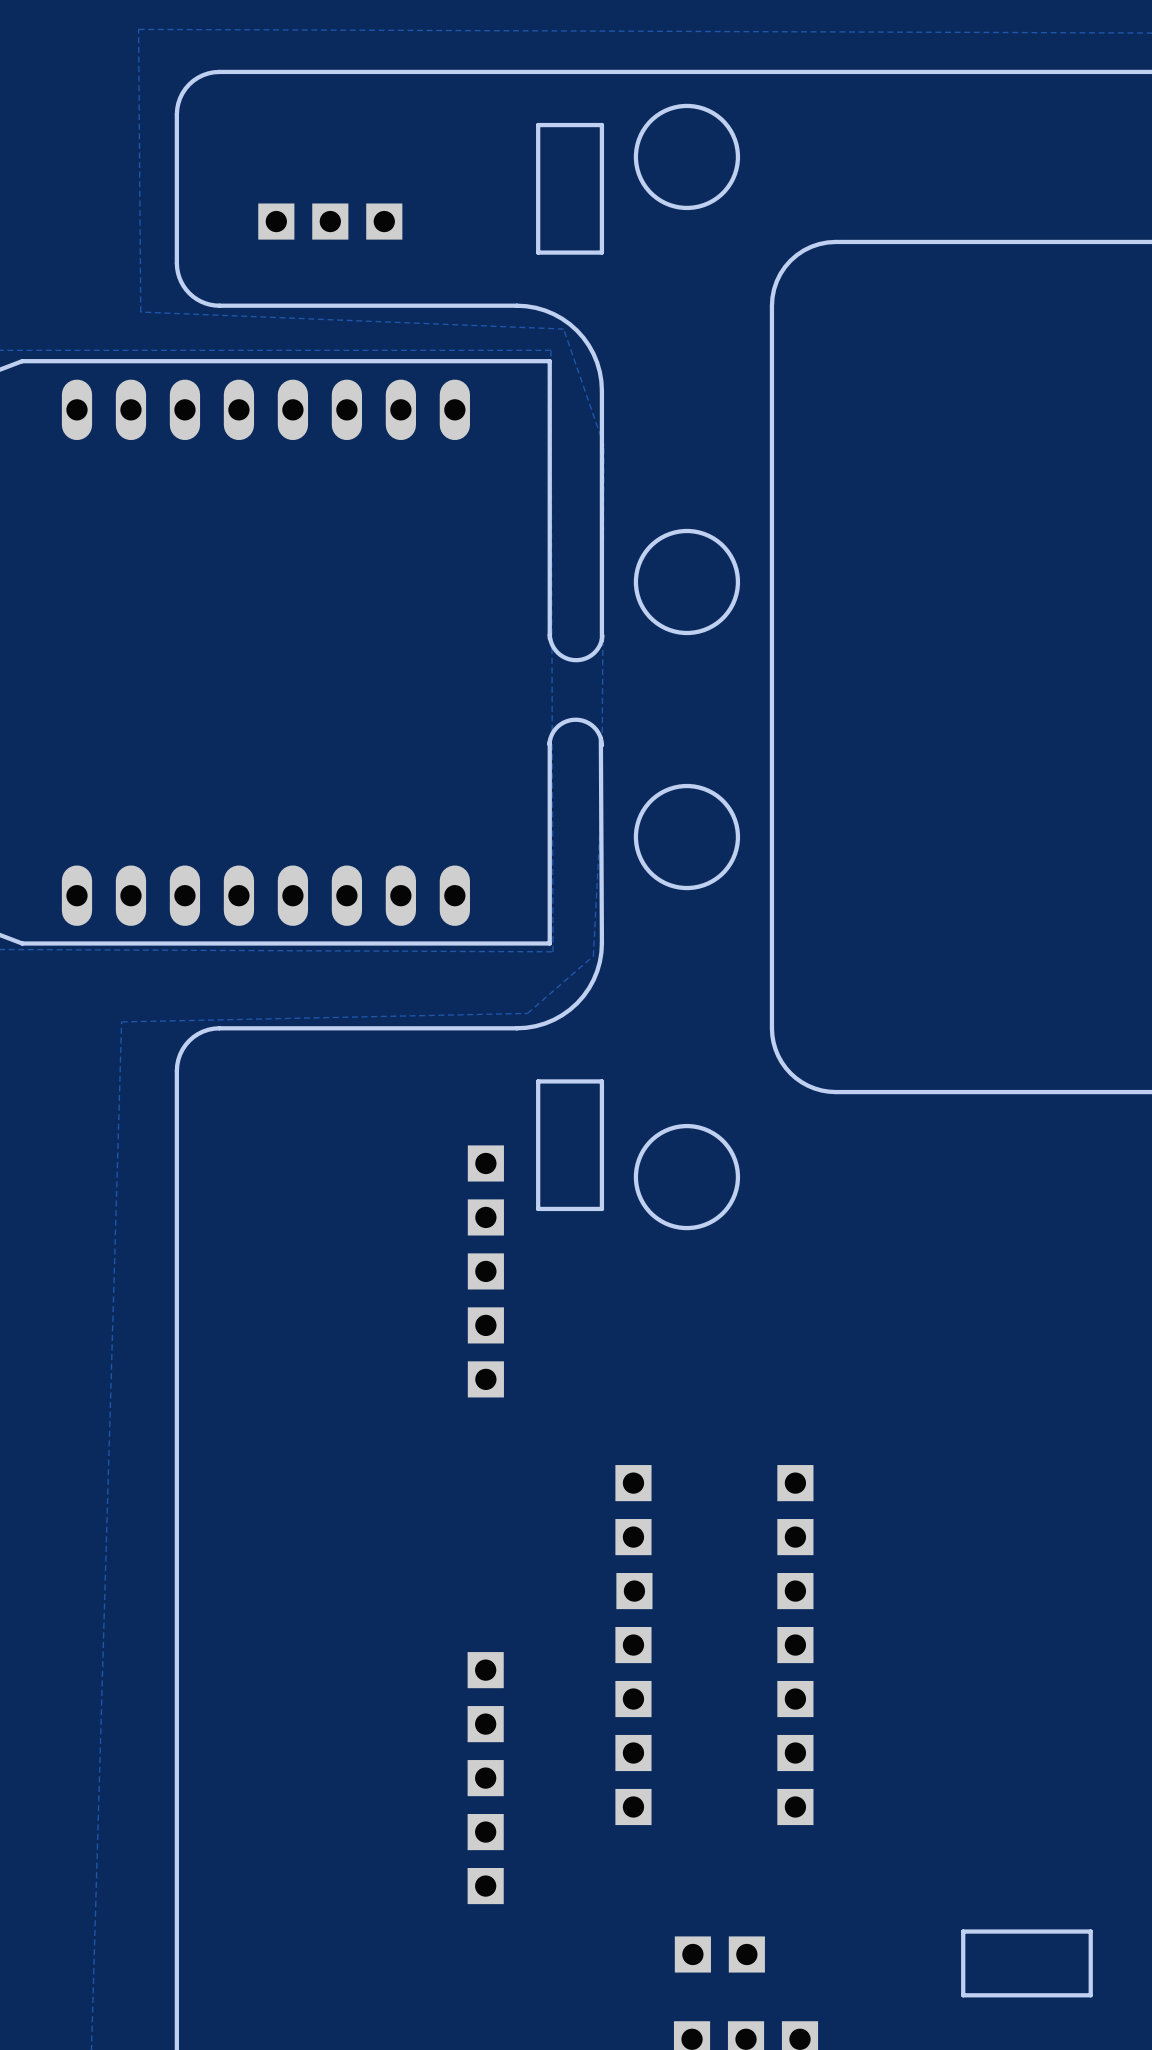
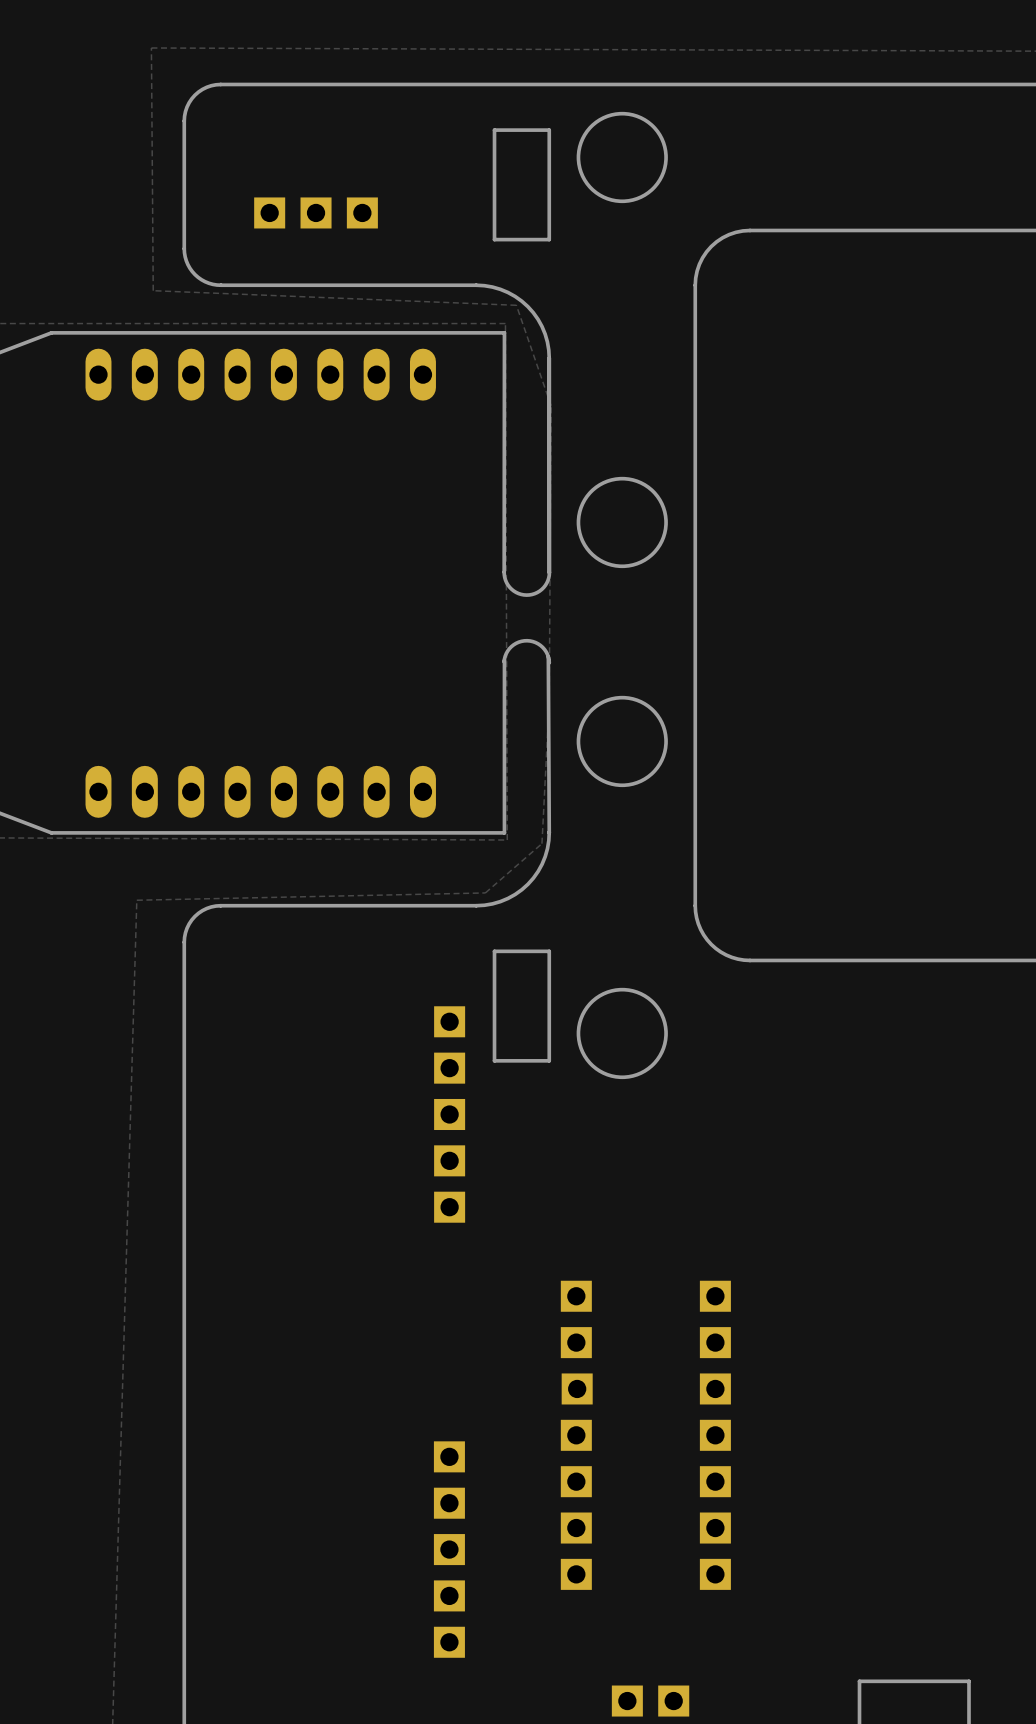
board edge: (549, 361) (549, 638) -> (504, 332) (504, 574) (511, 589) (523, 594) (532, 594) (541, 589) (549, 575) (549, 358)
board edge: (549, 634) (551, 644) (557, 652) (565, 658) (575, 660) (585, 658) (593, 653) (599, 645) (602, 635) -> none

